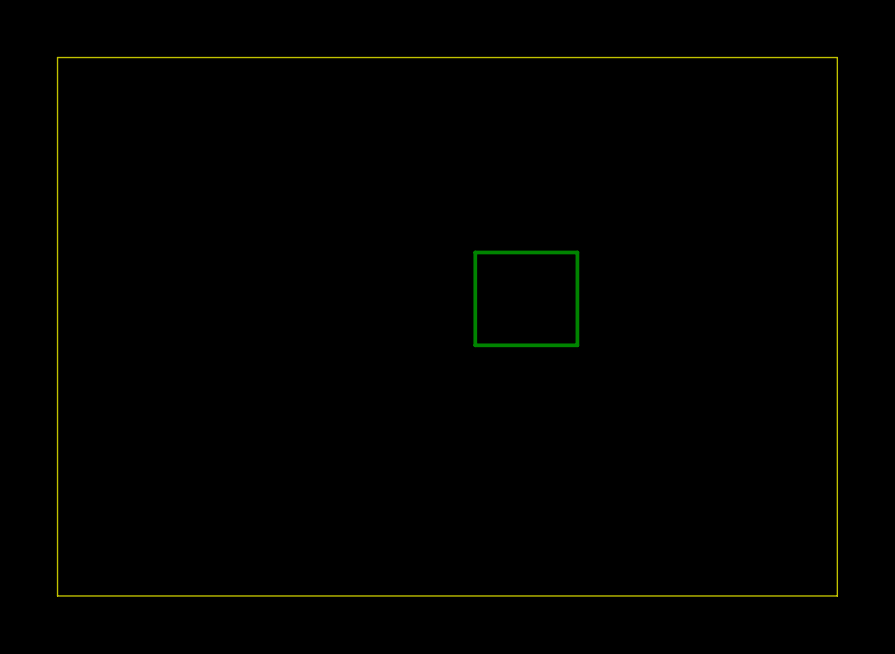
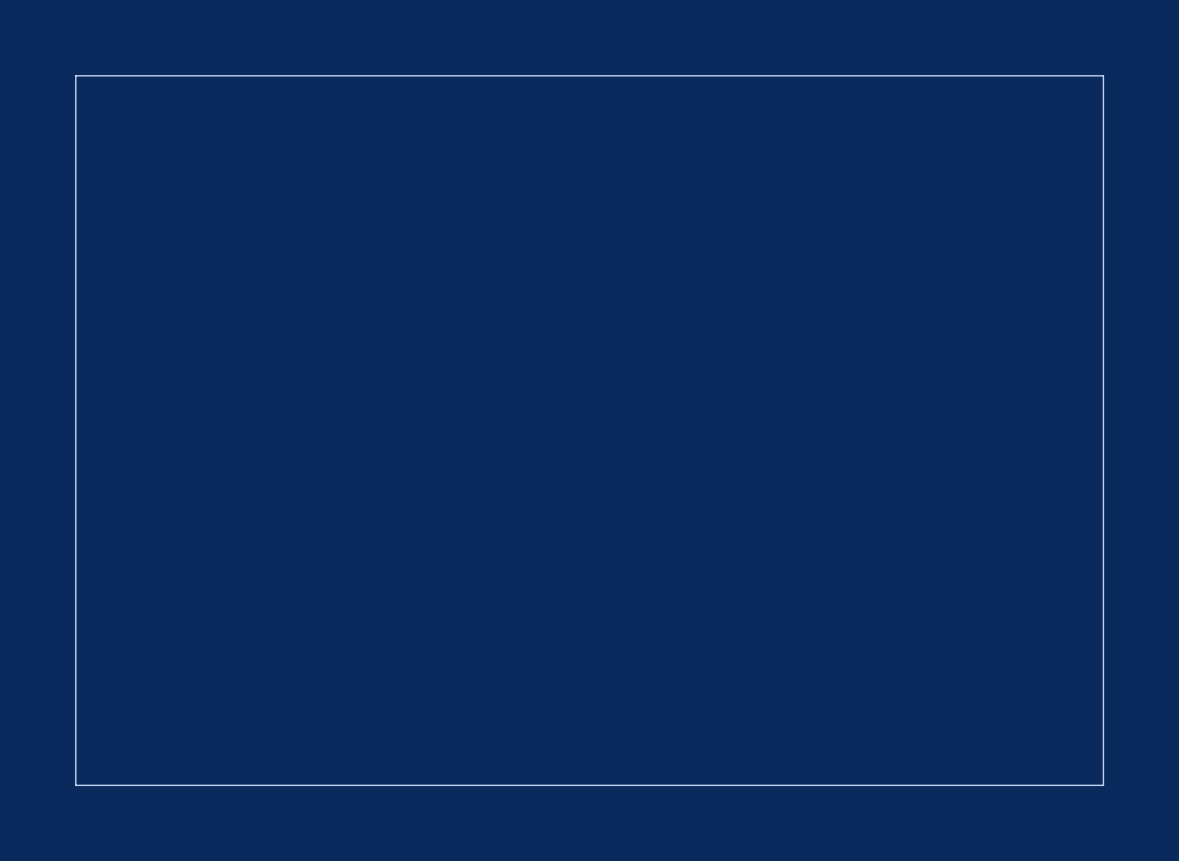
track: (577, 252) (577, 345) (475, 345) (475, 252) (577, 252) -> none

